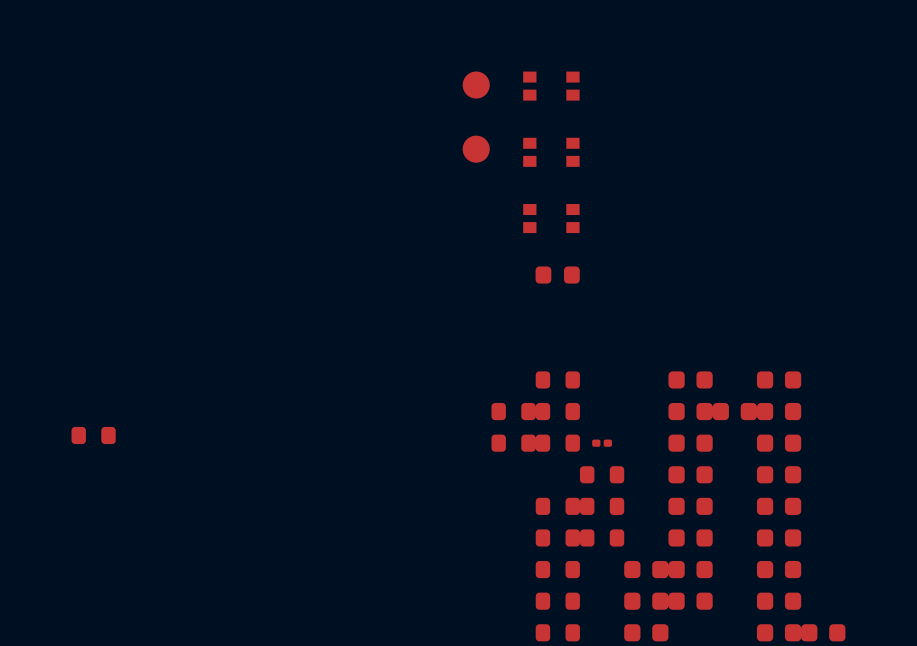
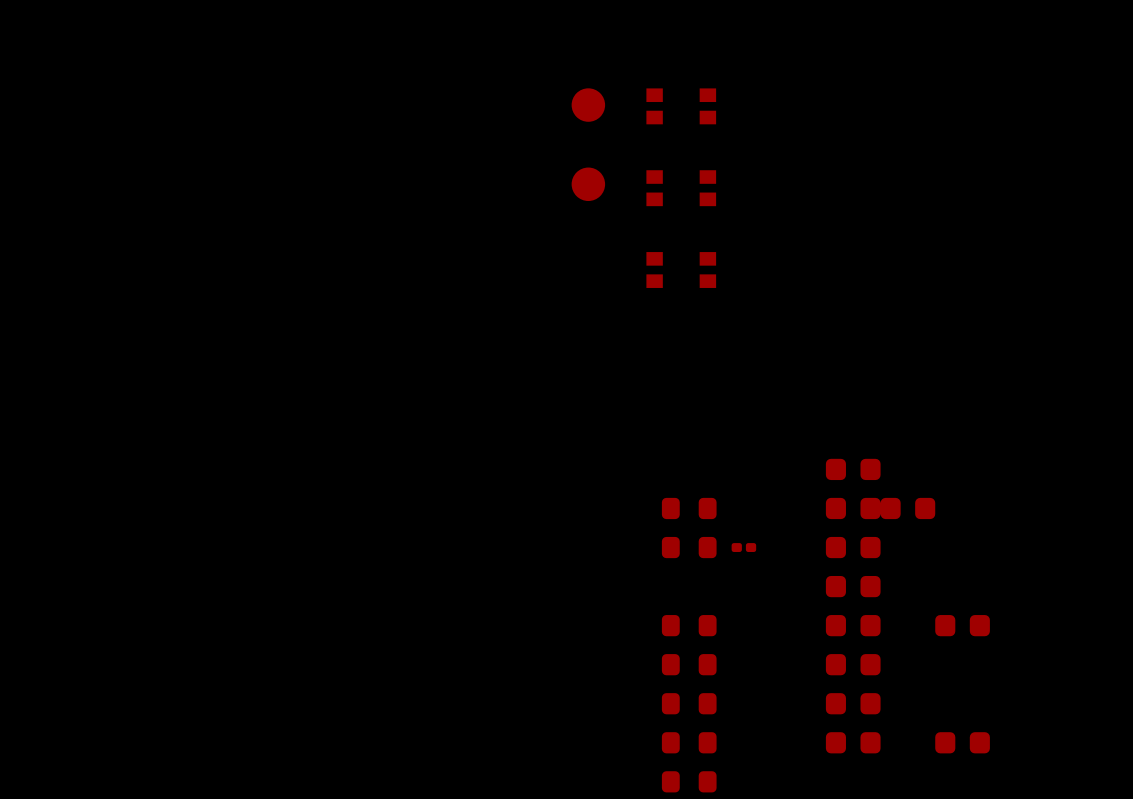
part: (557, 275) -> none
part: (557, 379) -> none
part: (779, 379) -> none
part: (513, 411) -> none
part: (779, 411) -> none
part: (93, 435) -> none
part: (513, 443) -> none
part: (779, 443) -> none
part: (602, 474) -> none
part: (779, 474) -> none
part: (602, 506) -> none
part: (602, 537) -> none
part: (779, 537) -> none
part: (646, 569) -> none
part: (779, 569) -> none
part: (646, 601) -> none
part: (646, 632) -> none
part: (779, 632) -> none
part: (823, 632) -> none

